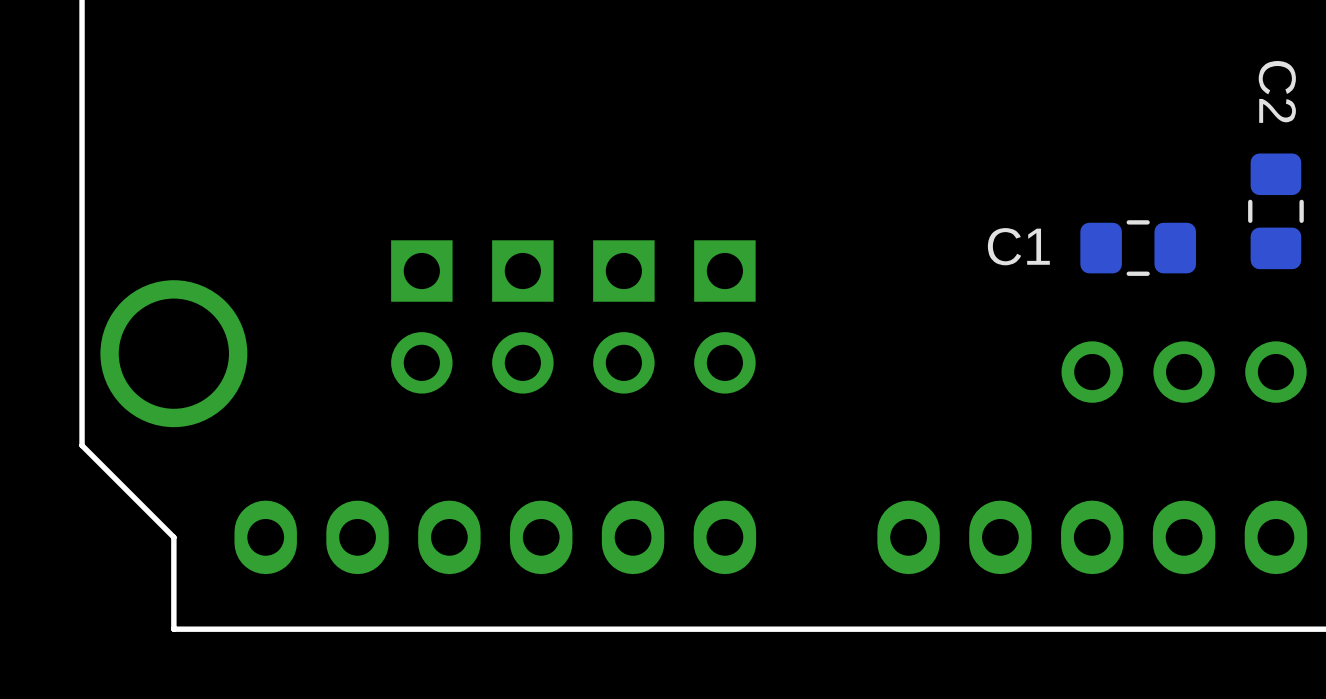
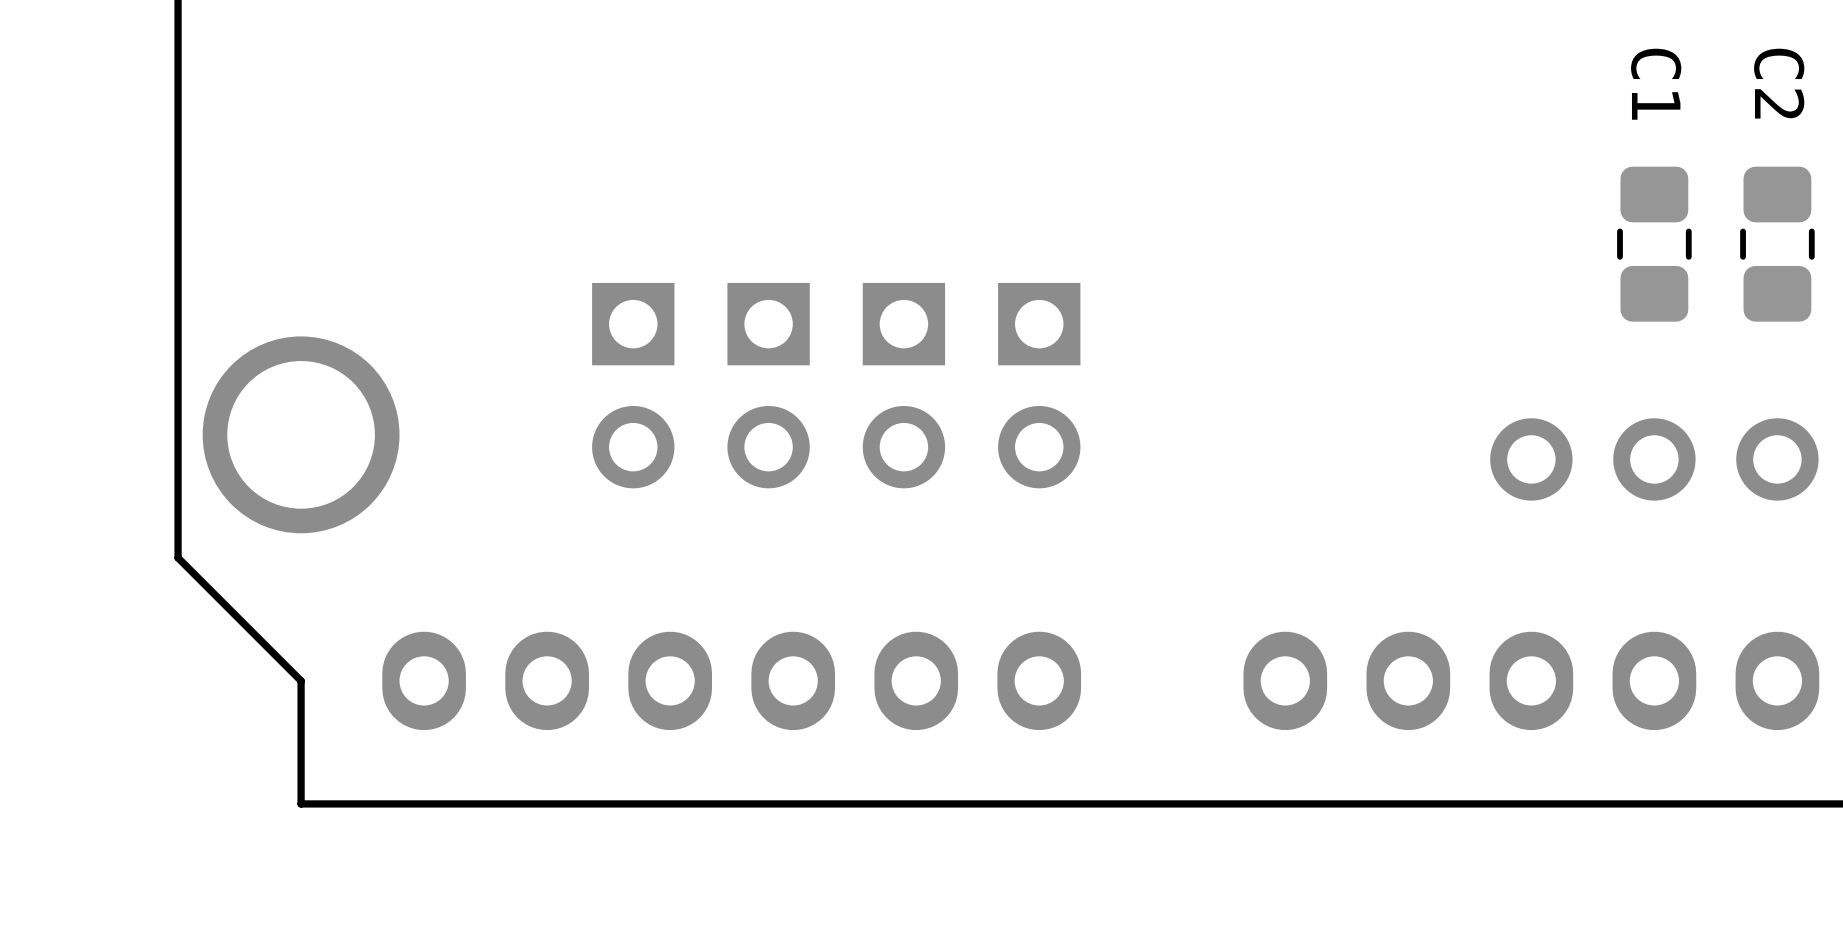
C1 rotation: 0° (1138, 248) -> 90° clockwise (1654, 244)

